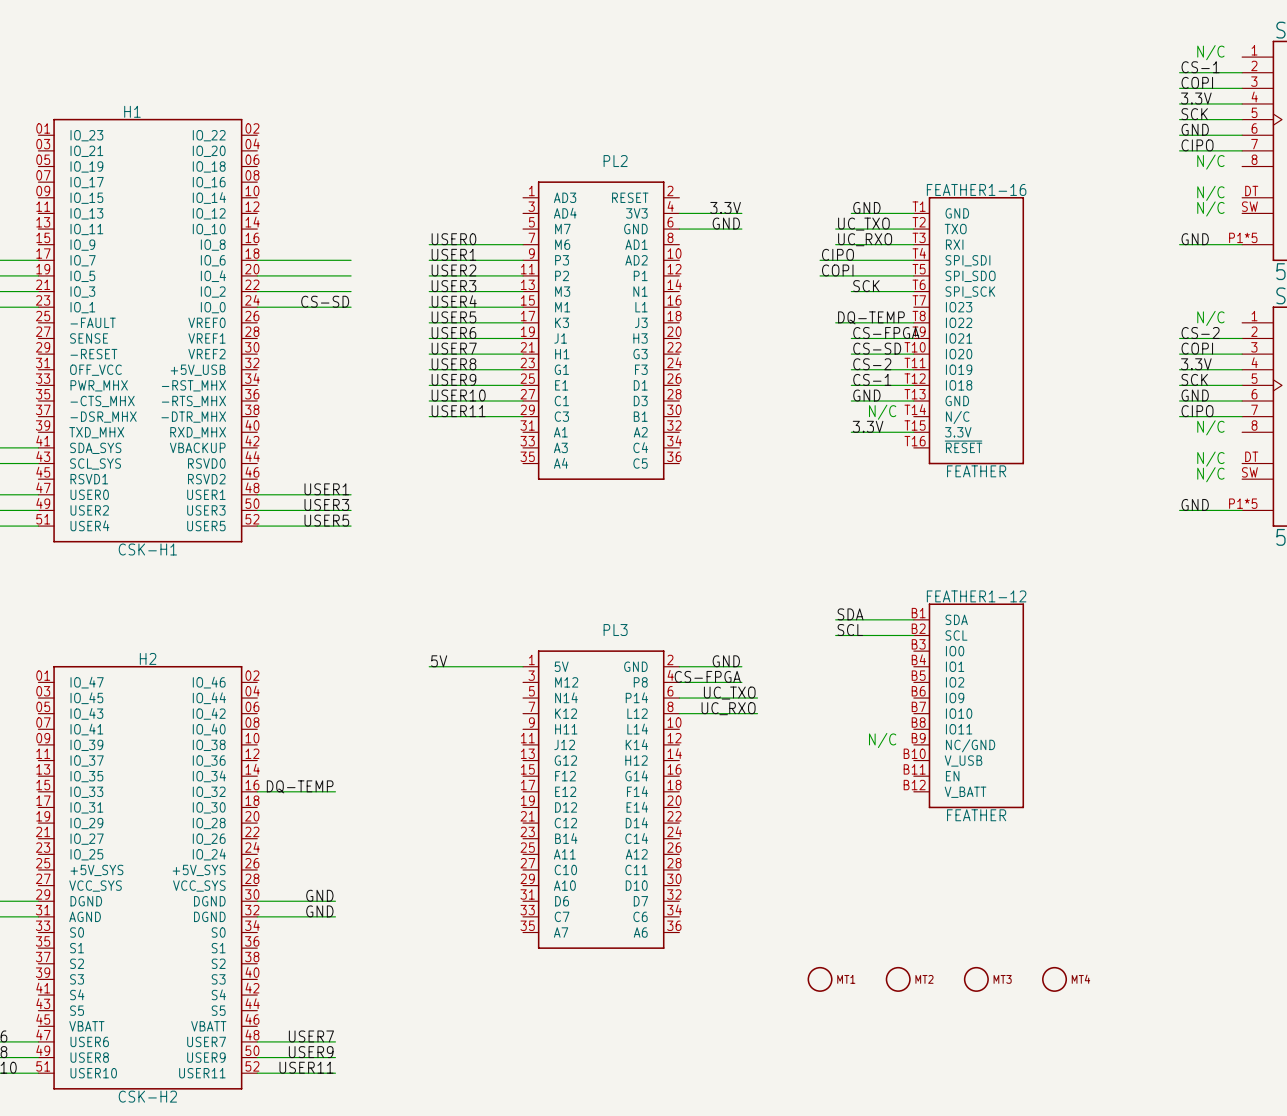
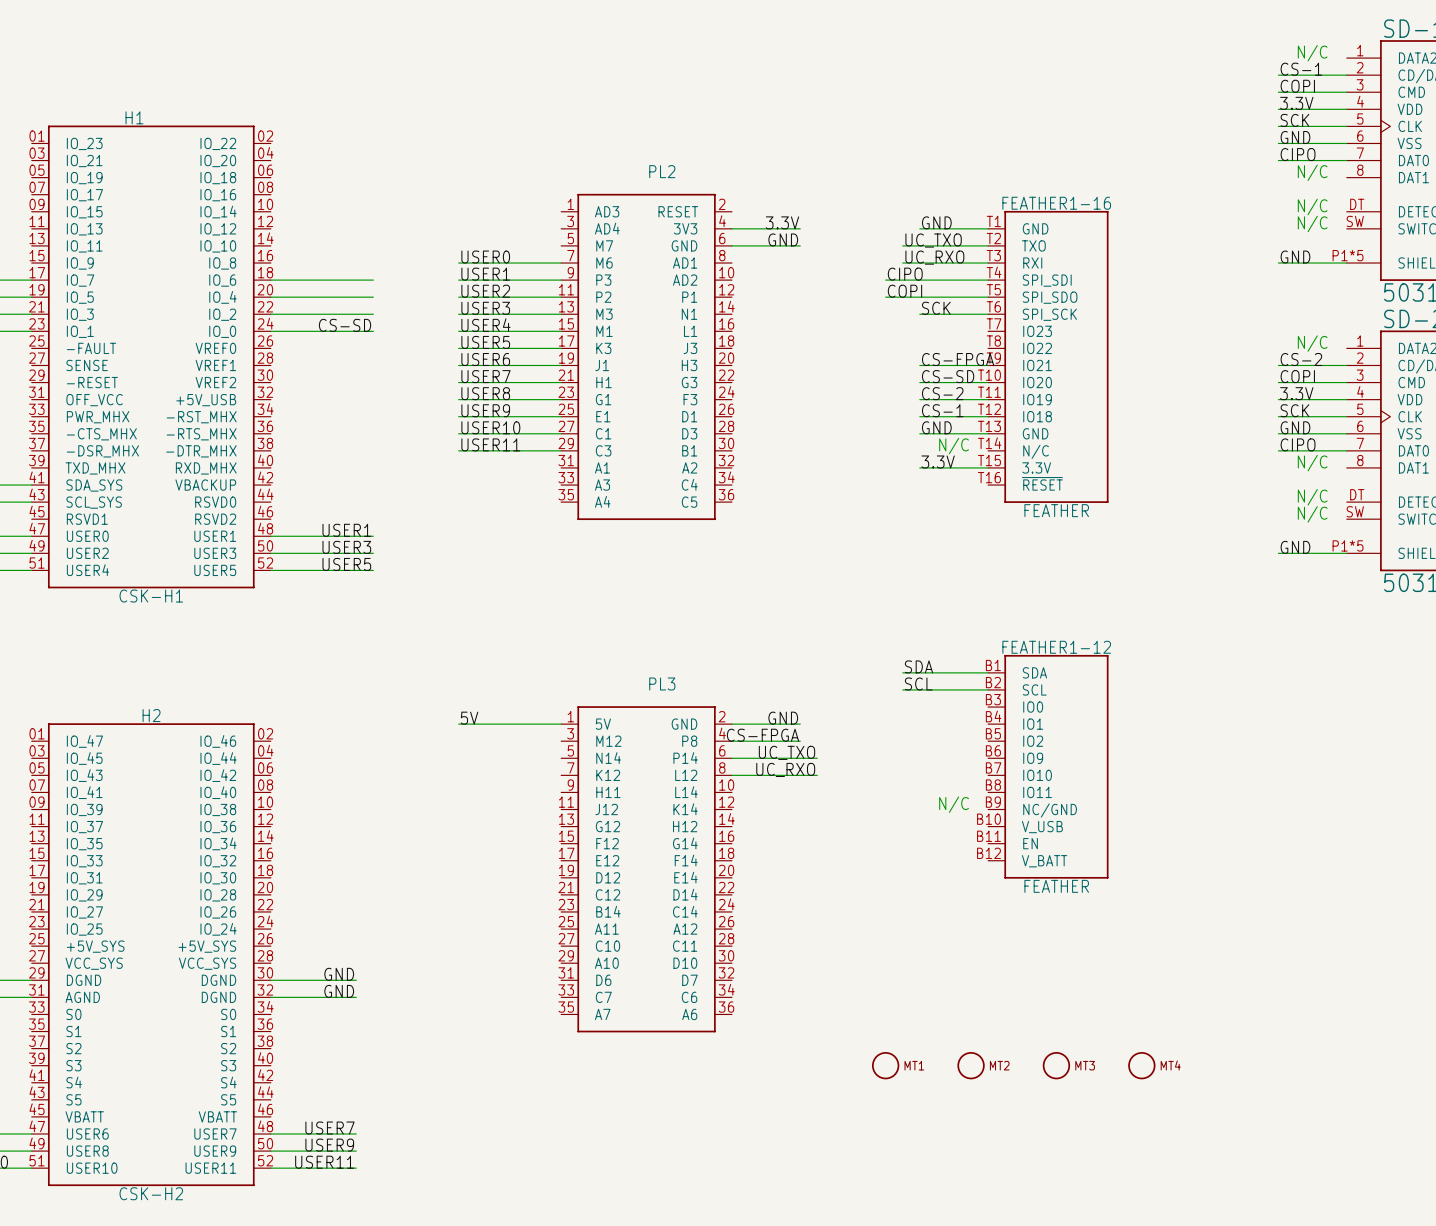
label: DQ-TEMP (871, 317) -> none
wire: (835, 322) (913, 322) -> none
label: DQ-TEMP (300, 786) -> none
wire: (257, 791) (335, 791) -> none

